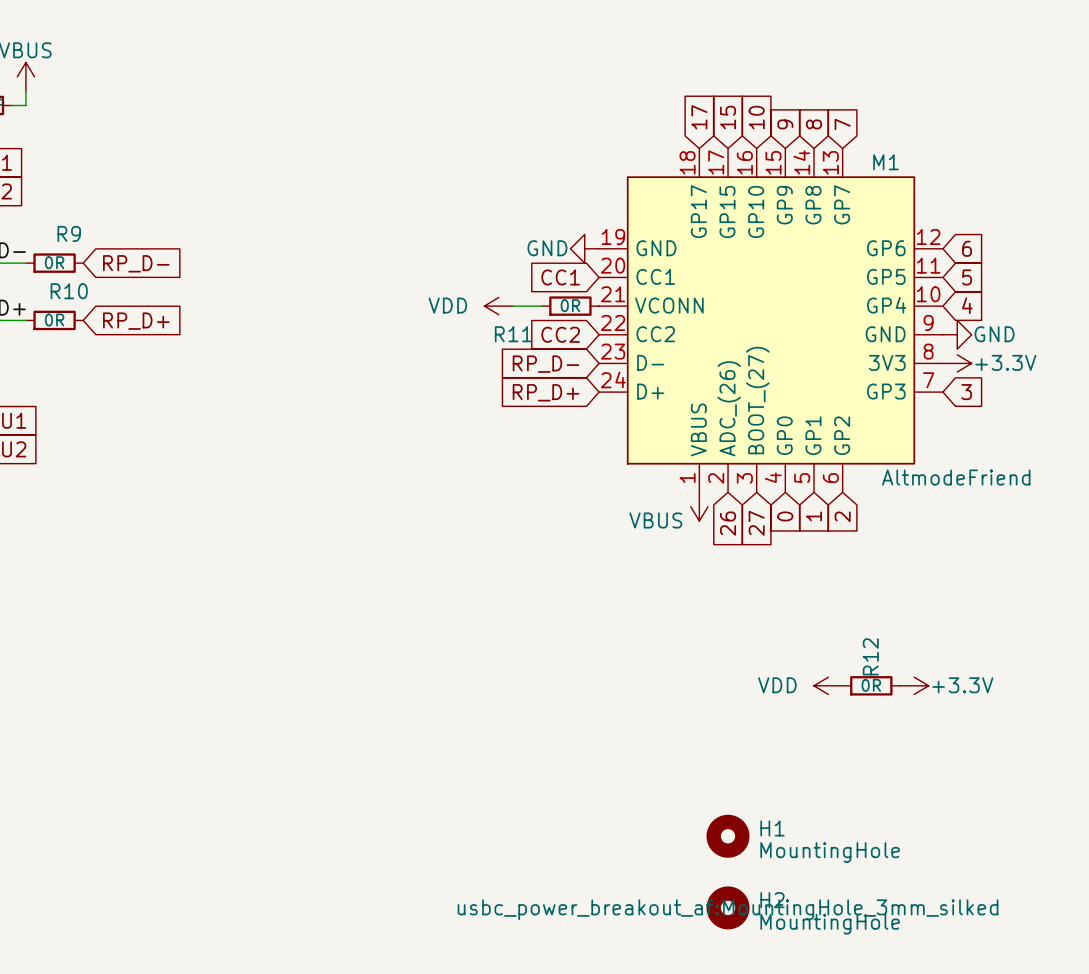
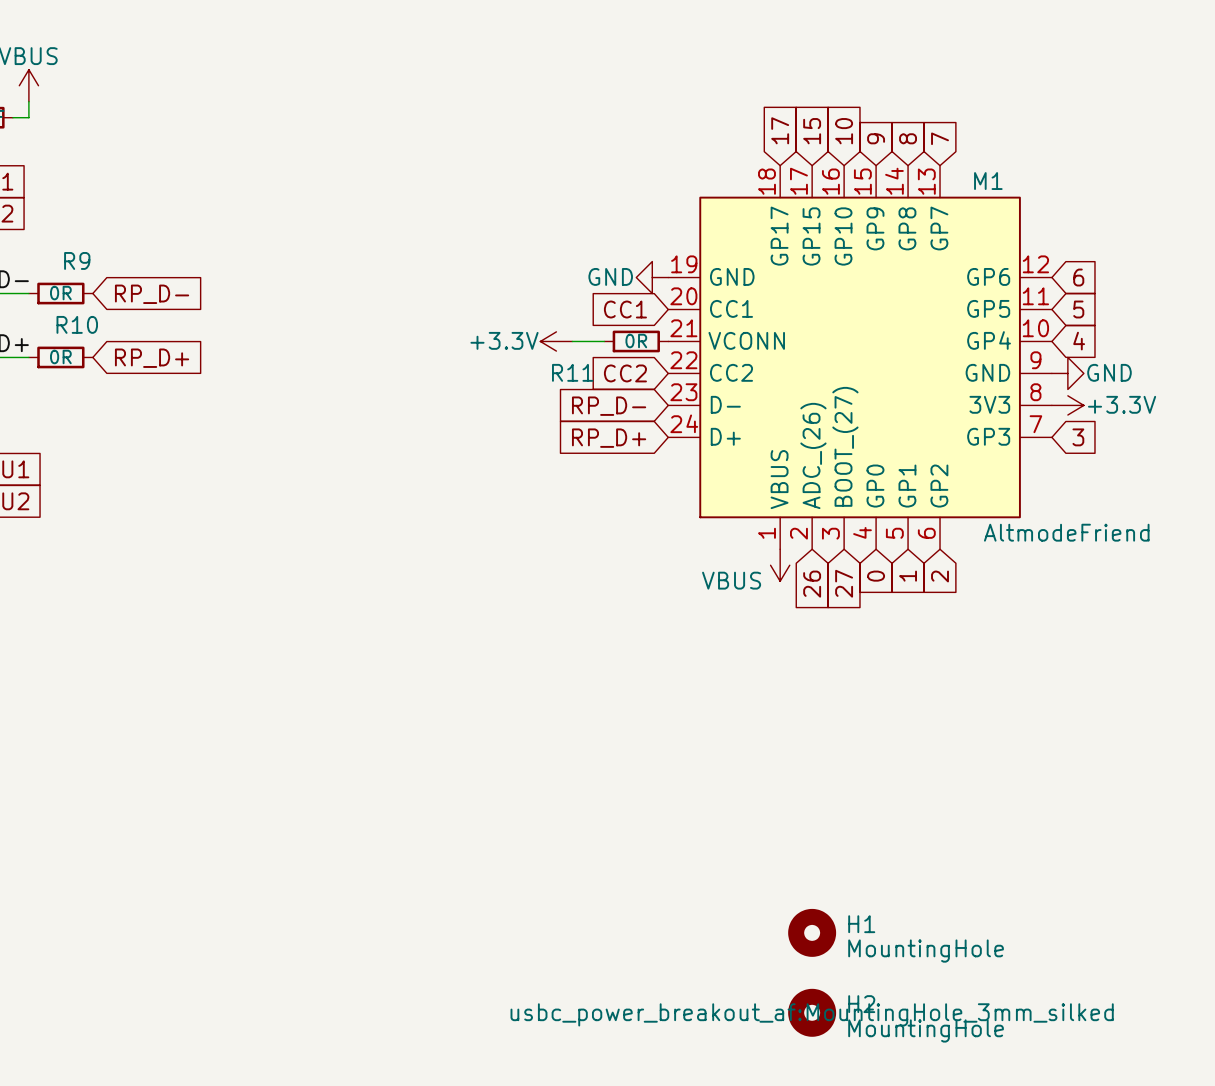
power symbol: VDD (498, 306) -> +3.3V (556, 341)
power symbol: VDD (828, 685) -> none
R12: 0R (871, 685) -> none
power symbol: +3.3V (914, 685) -> none

